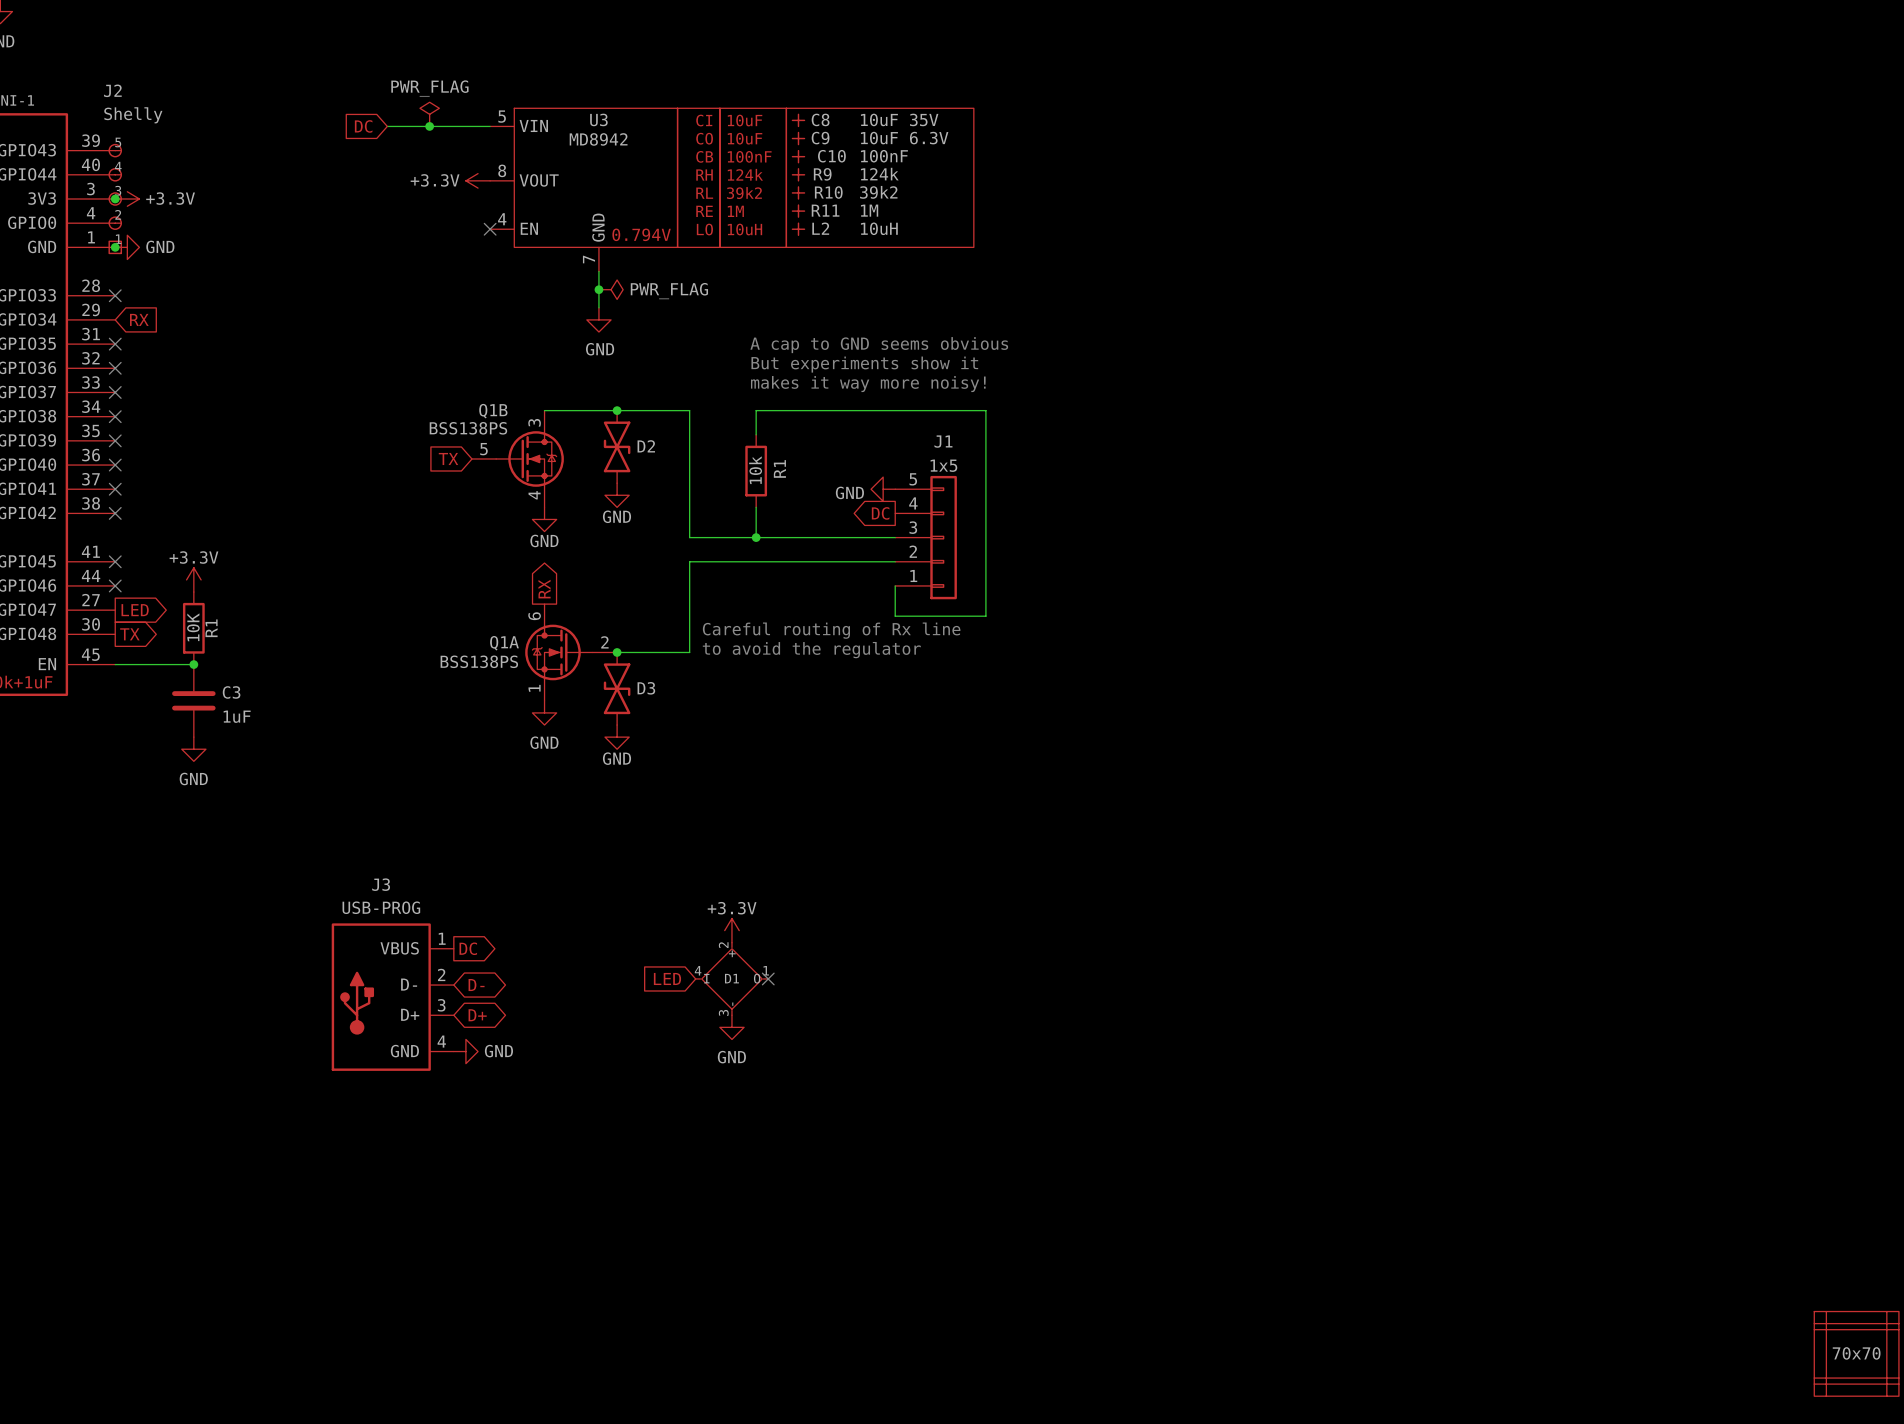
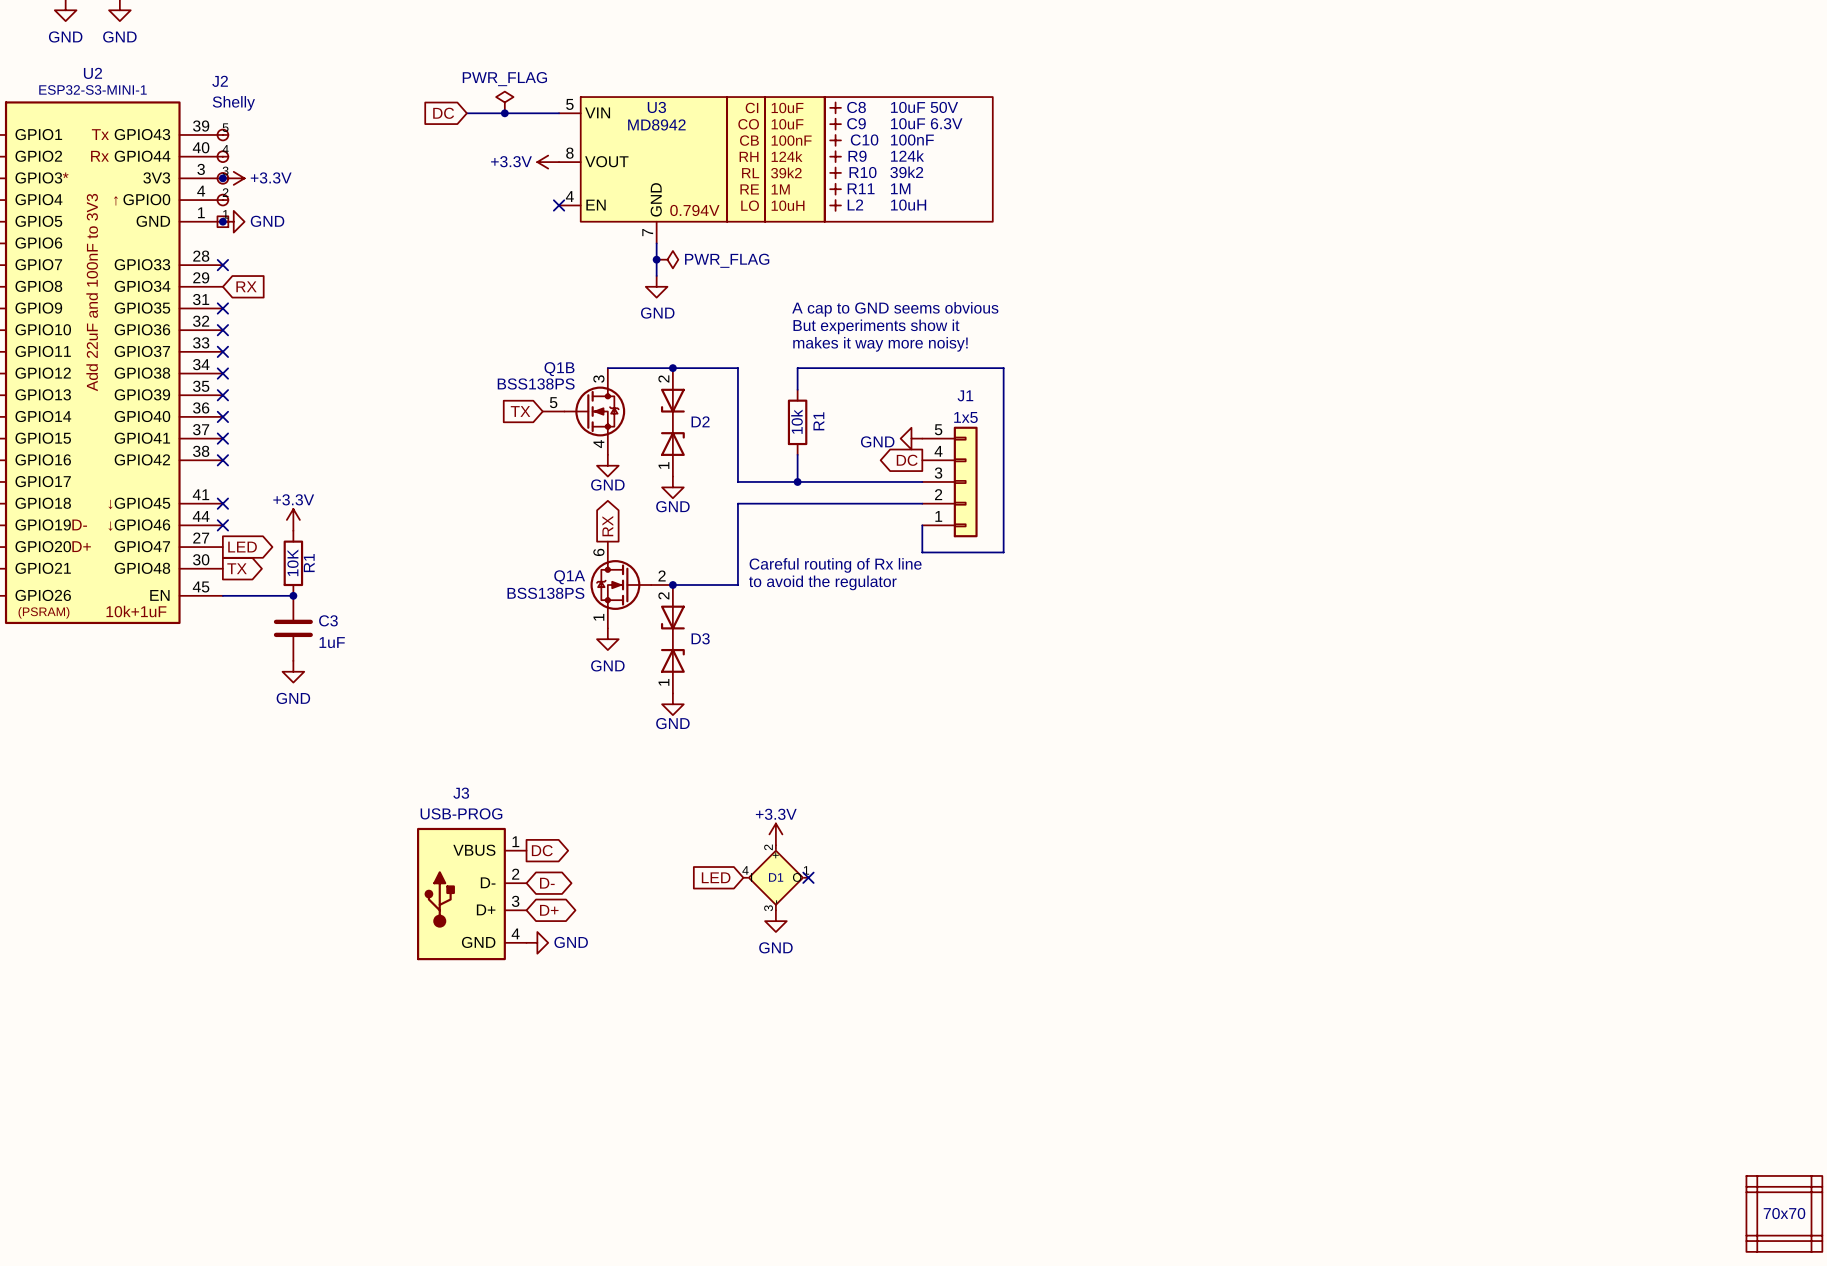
C8 value: 10uF 35V (899, 119) -> 10uF 50V (924, 107)
D2 symbol: [603, 410, 631, 484] -> [660, 368, 685, 477]
power symbol position: GND (617, 495) -> GND (672, 487)
D3 symbol: [603, 652, 631, 726] -> [660, 585, 685, 694]
power symbol position: GND (617, 737) -> GND (672, 704)

